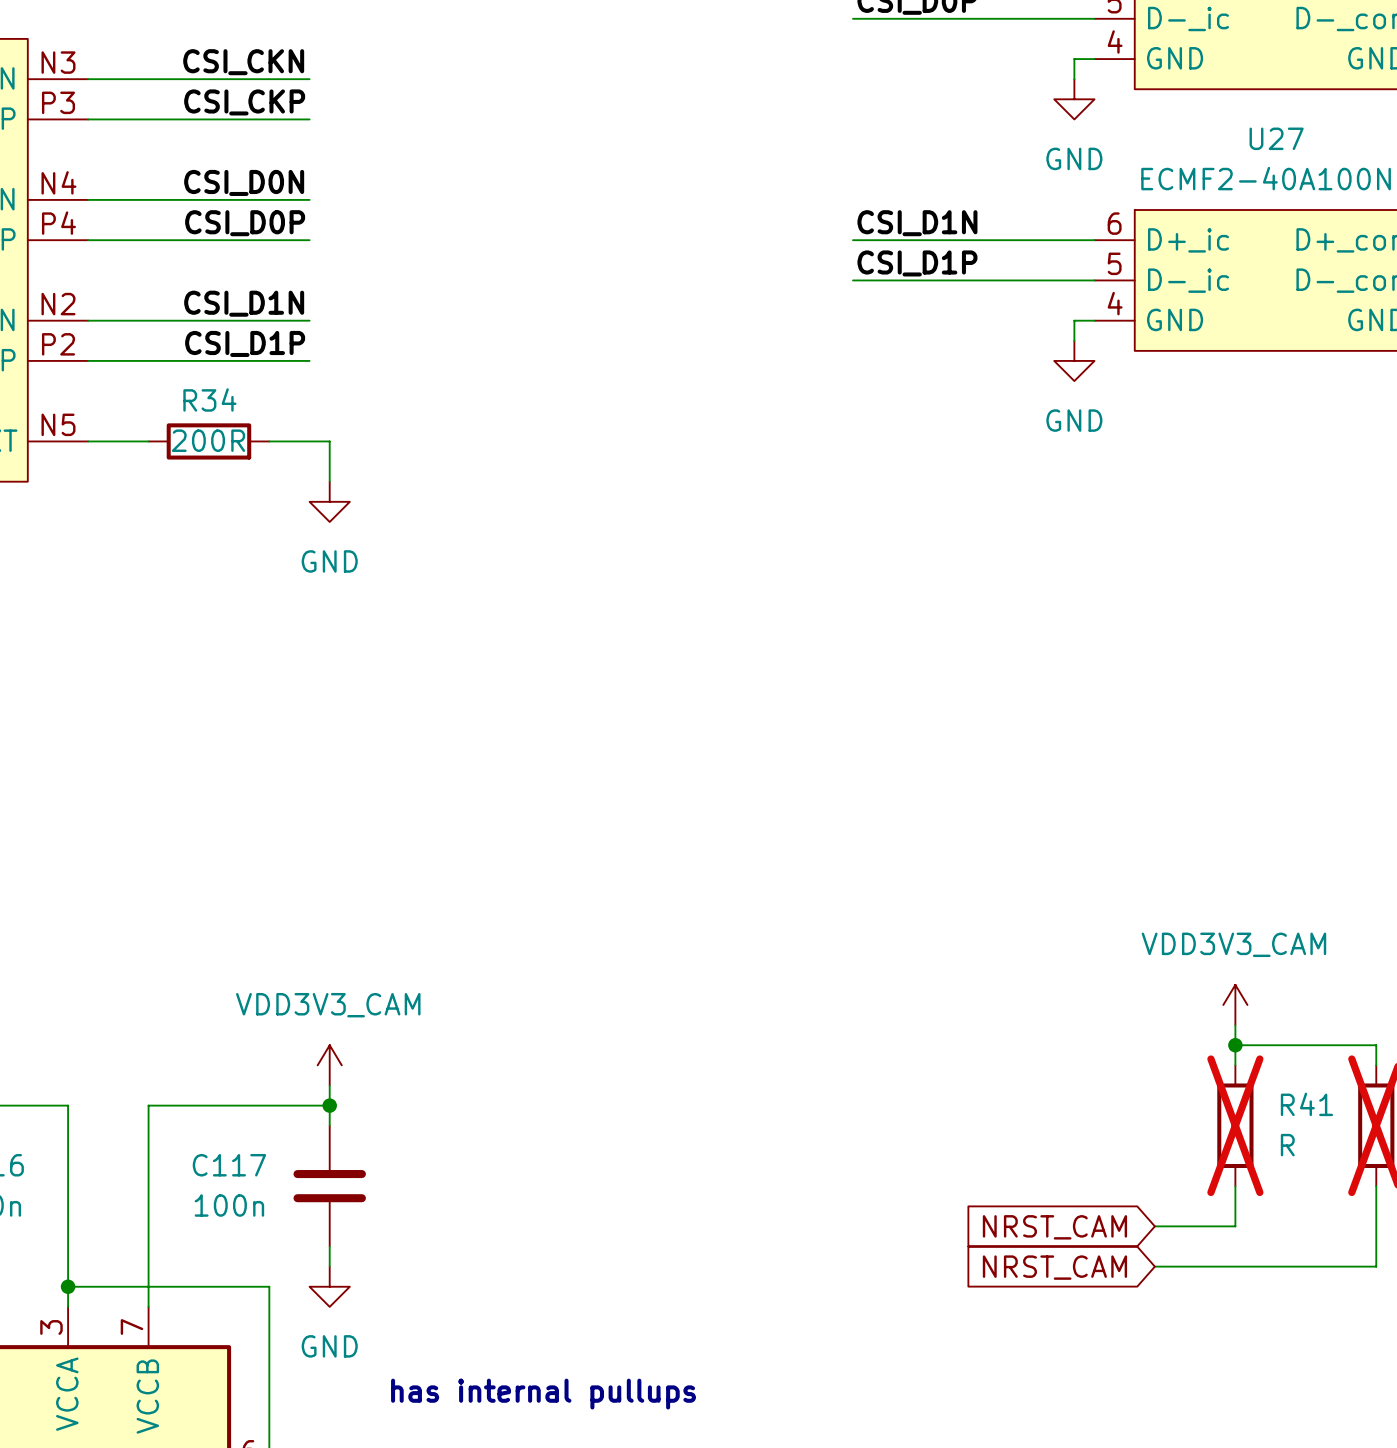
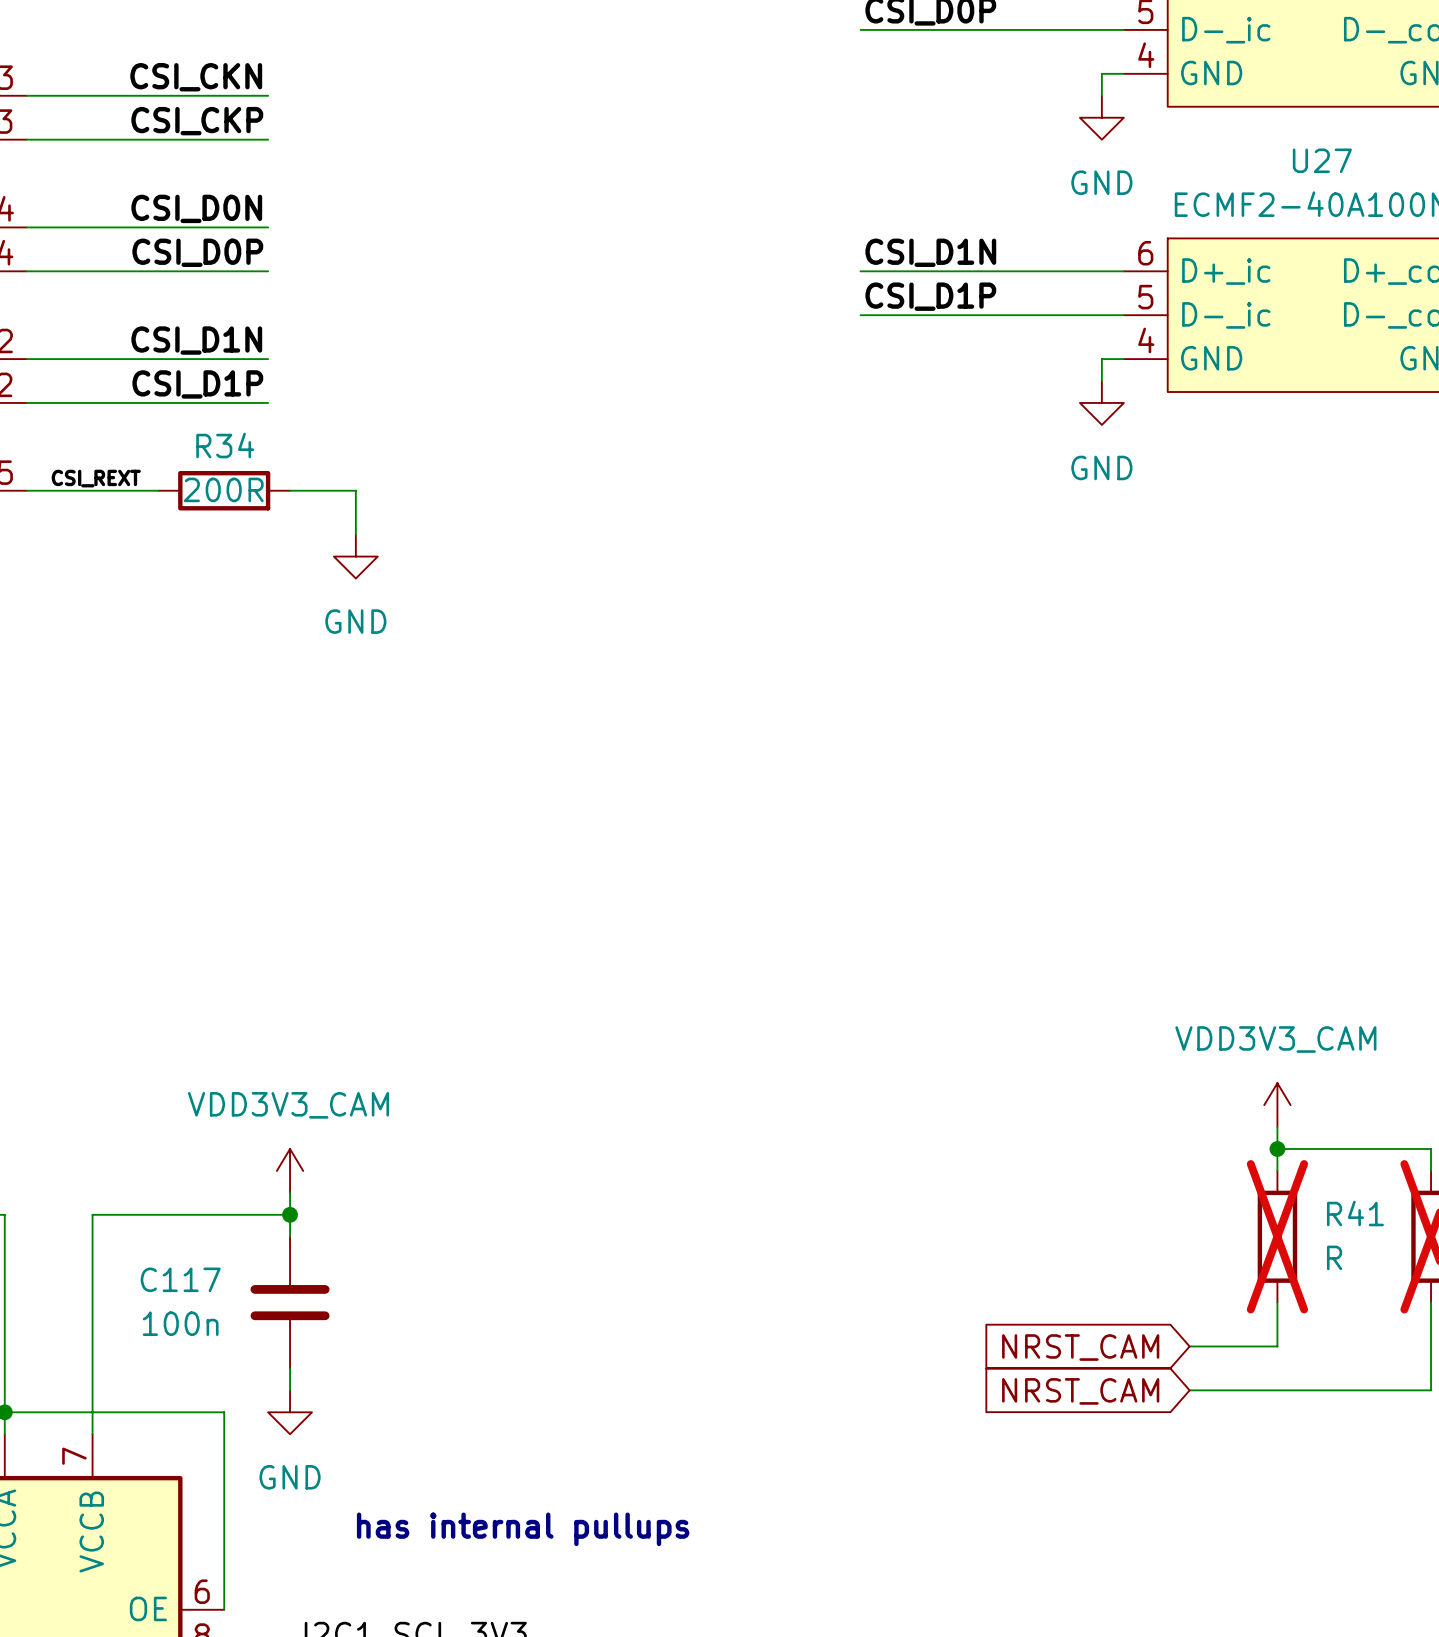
label: none -> CSI_REXT (96, 478)
wire: none -> (92, 490) (158, 490)
R34 position: (208, 441) -> (224, 490)
wire: (269, 441) (329, 441) (329, 481) -> (290, 490) (355, 490) (355, 534)
power symbol position: GND (329, 501) -> GND (355, 556)

